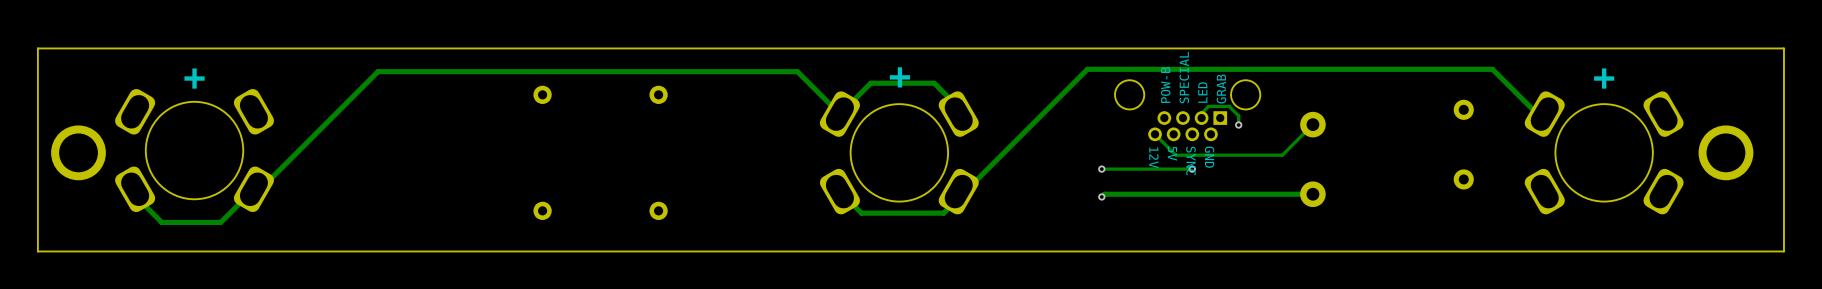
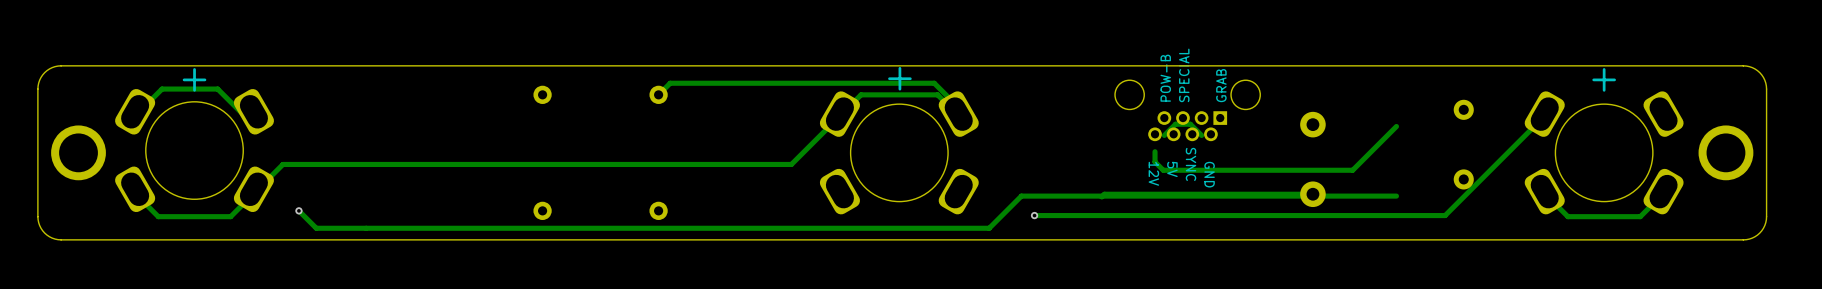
track: (870, 83) (839, 114) (797, 71) (378, 71) (260, 188) (254, 188) (220, 222) (161, 222) (128, 188) -> (870, 83) (670, 83) (658, 94)
board edge: (37, 89) (37, 48) (1783, 48) (1783, 251) (37, 251) (37, 216) -> (37, 89) (39, 80) (44, 72) (52, 67) (61, 65) (1743, 65) (1752, 67) (1759, 72) (1764, 80) (1766, 89) (1766, 219) (1759, 233) (1746, 239) (61, 239) (52, 238) (44, 233) (39, 225) (37, 216)
text: LED (1202, 92) -> none
track: (1537, 114) (1492, 69) (1087, 69) (943, 213) (861, 213) (839, 191) -> none
track: none -> (253, 115) (244, 115) (217, 89) (162, 89) (135, 115)
track: none -> (958, 115) (937, 94) (861, 94) (791, 164) (282, 164) (230, 216) (158, 216) (135, 193)
track: none -> (1544, 115) (1445, 215) (1034, 215)
track: (1201, 118) (1201, 113) (1208, 106) (1229, 106) (1238, 115) (1238, 125) -> none
track: (1312, 124) (1282, 155) (1175, 155) (1155, 134) -> none
via: (1238, 125) -> none
track: none -> (1396, 126) (1352, 170) (1163, 170) (1155, 162) (1155, 151)
track: none -> (1201, 135) (1190, 124) (1175, 124) (1164, 135)
text position: 5V (1172, 153) -> 5V (1172, 169)
text position: 12V (1153, 157) -> 12V (1153, 173)
text position: GND (1209, 157) -> GND (1209, 174)
via: (1101, 169) -> none
track: (1192, 169) (1101, 169) -> none
via: (1192, 169) -> none
track: none -> (1663, 193) (1640, 216) (1567, 216) (1544, 193)
via: (1101, 196) -> none
track: none -> (1396, 196) (1021, 196) (989, 228) (316, 228) (298, 210)
via: none -> (298, 210)
via: none -> (1034, 215)

